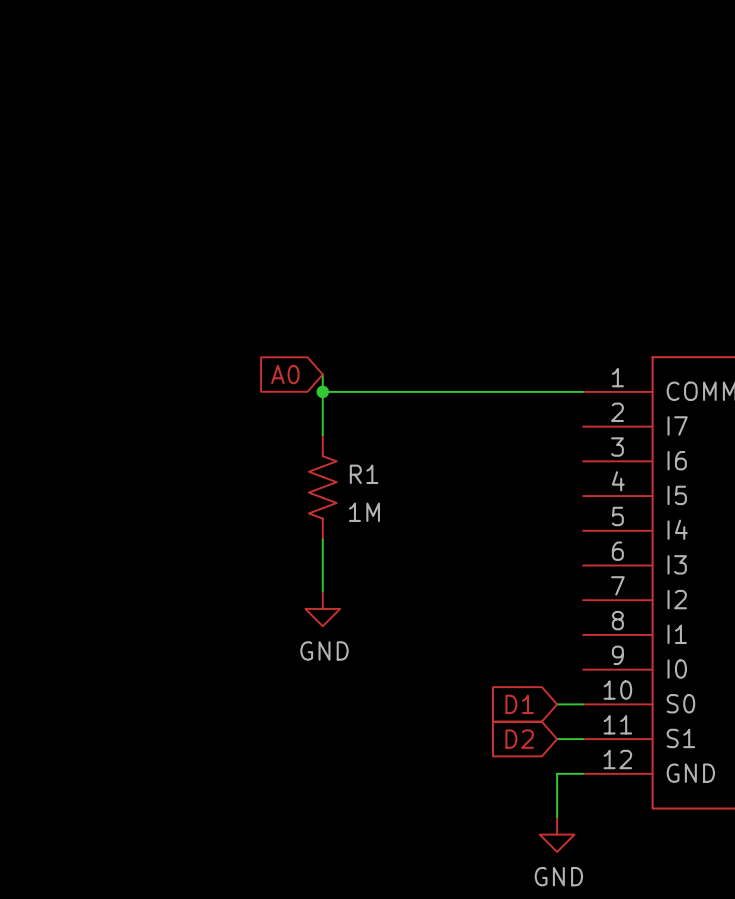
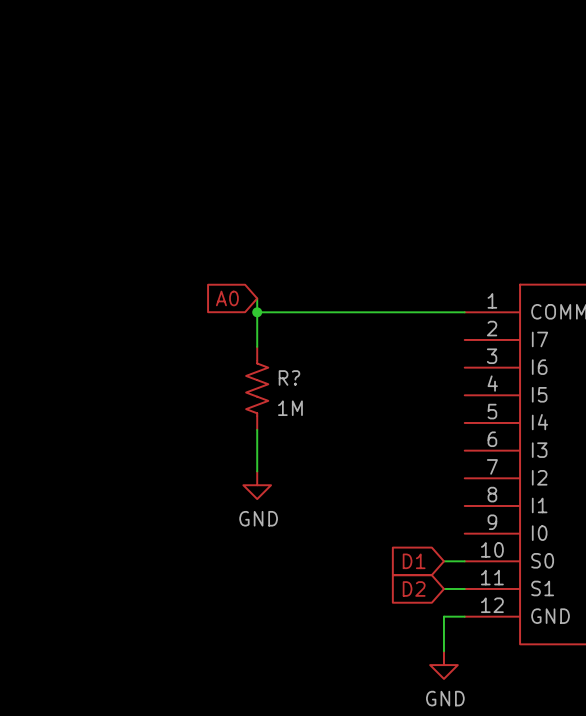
R1 name: R1 (364, 474) -> R? (289, 377)

